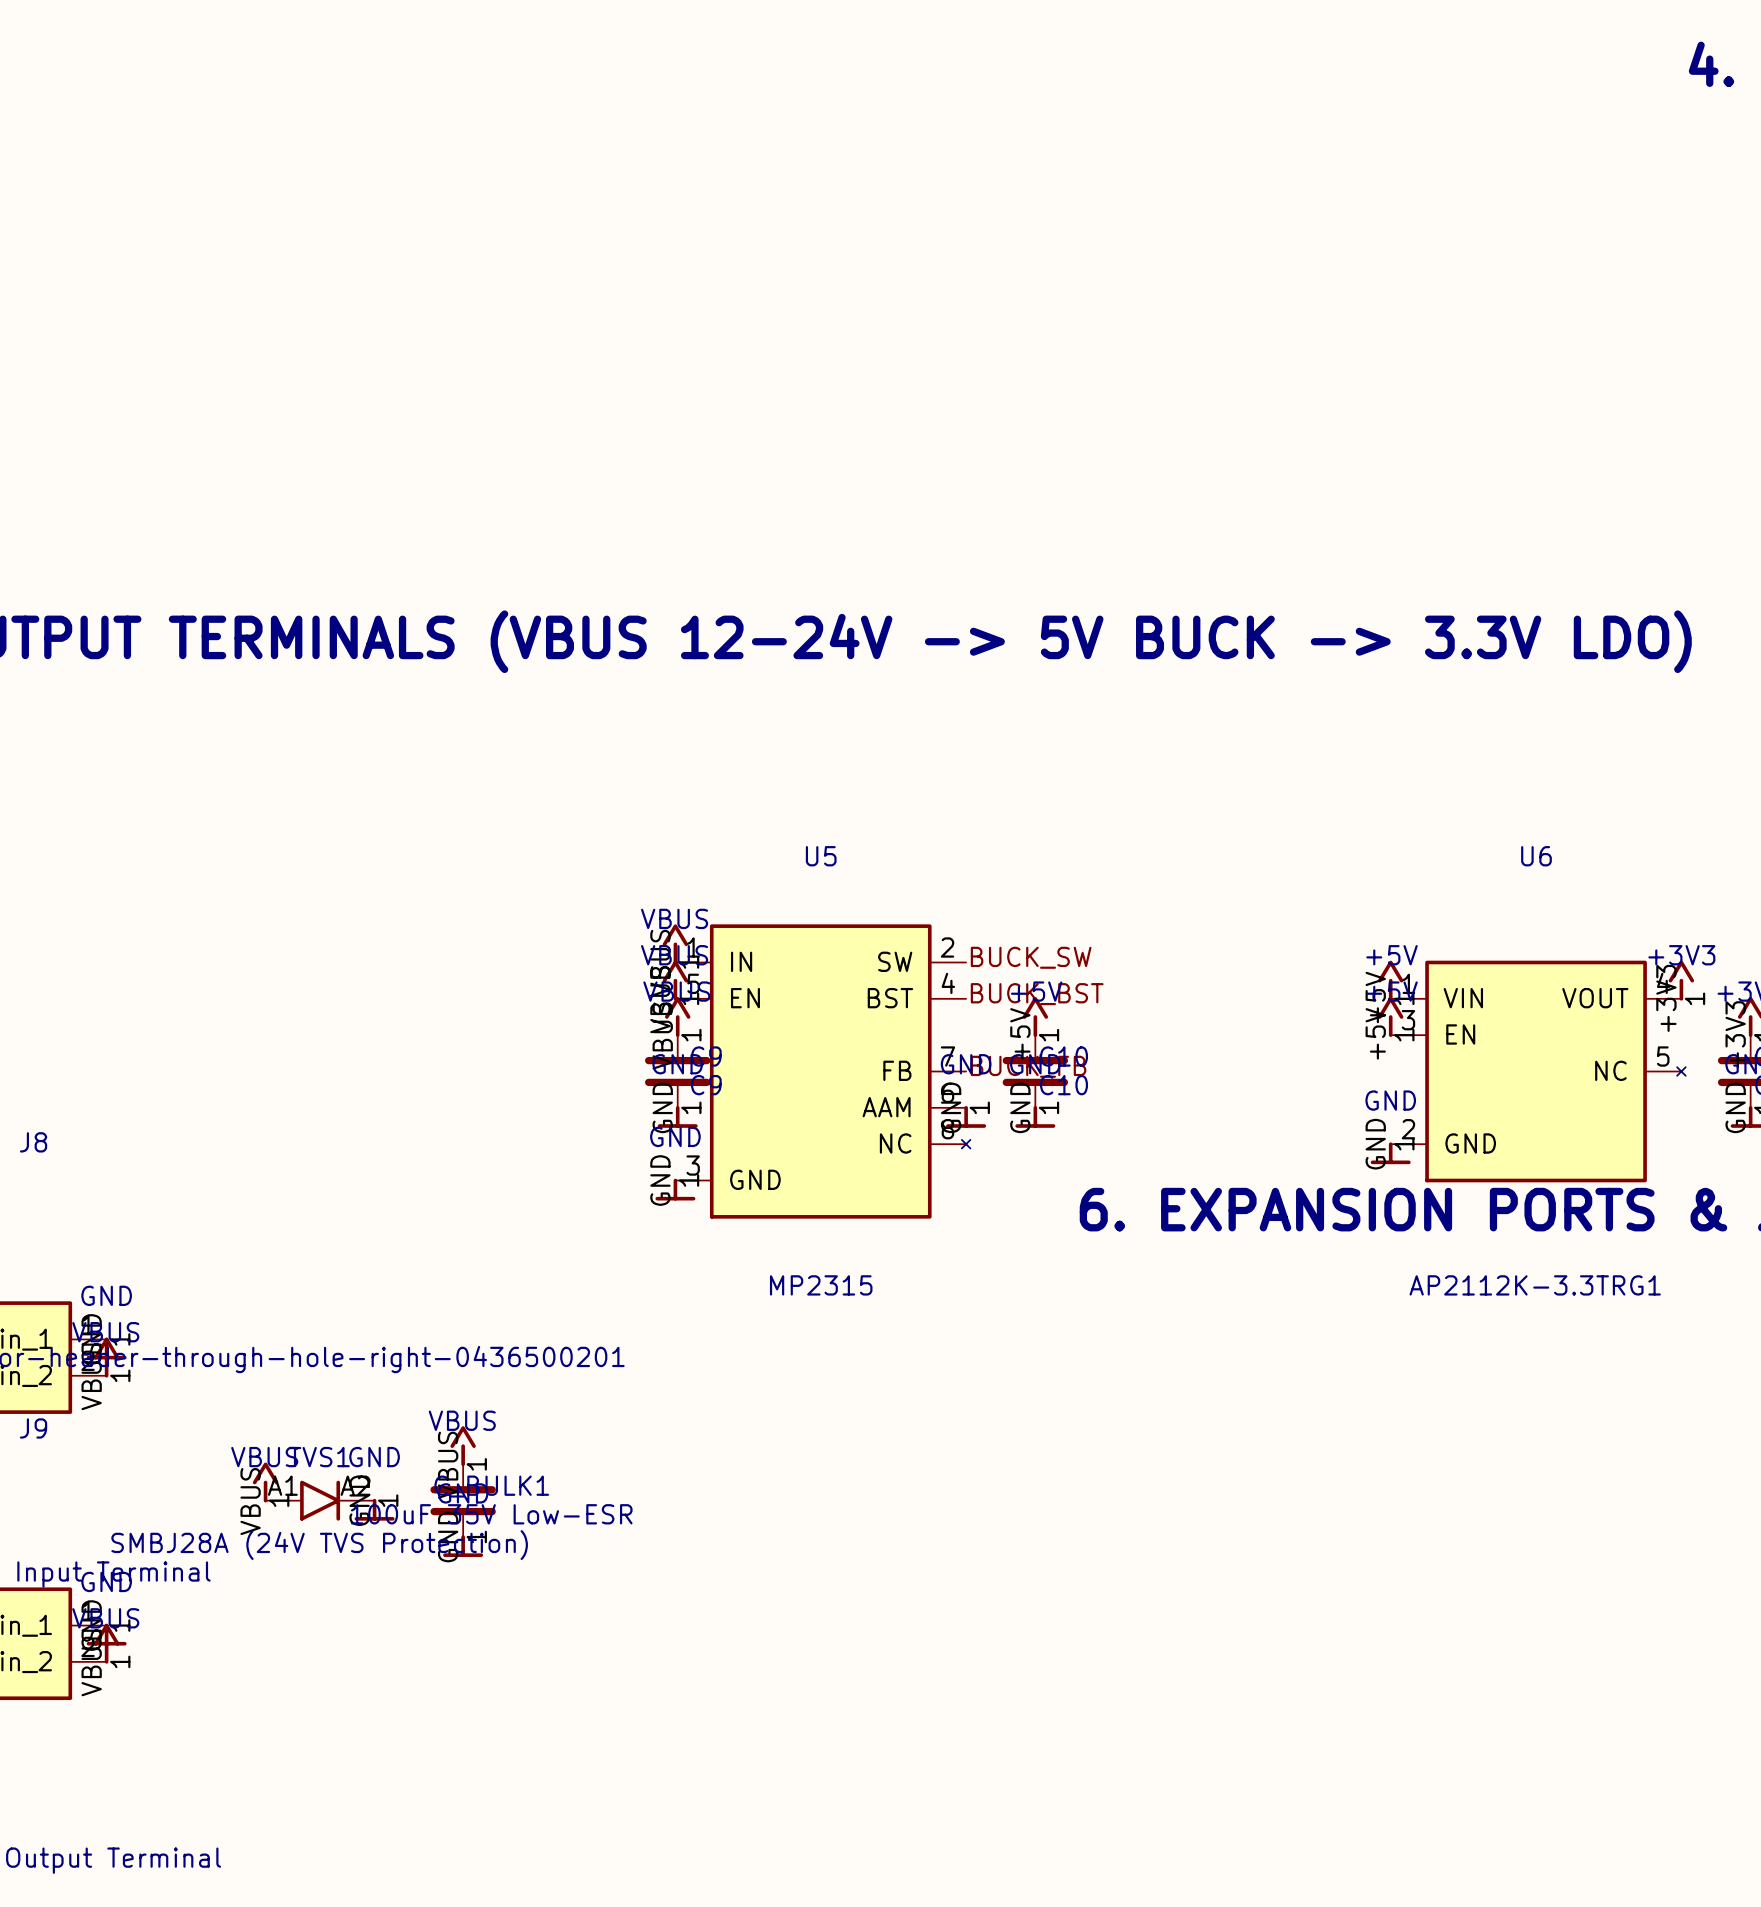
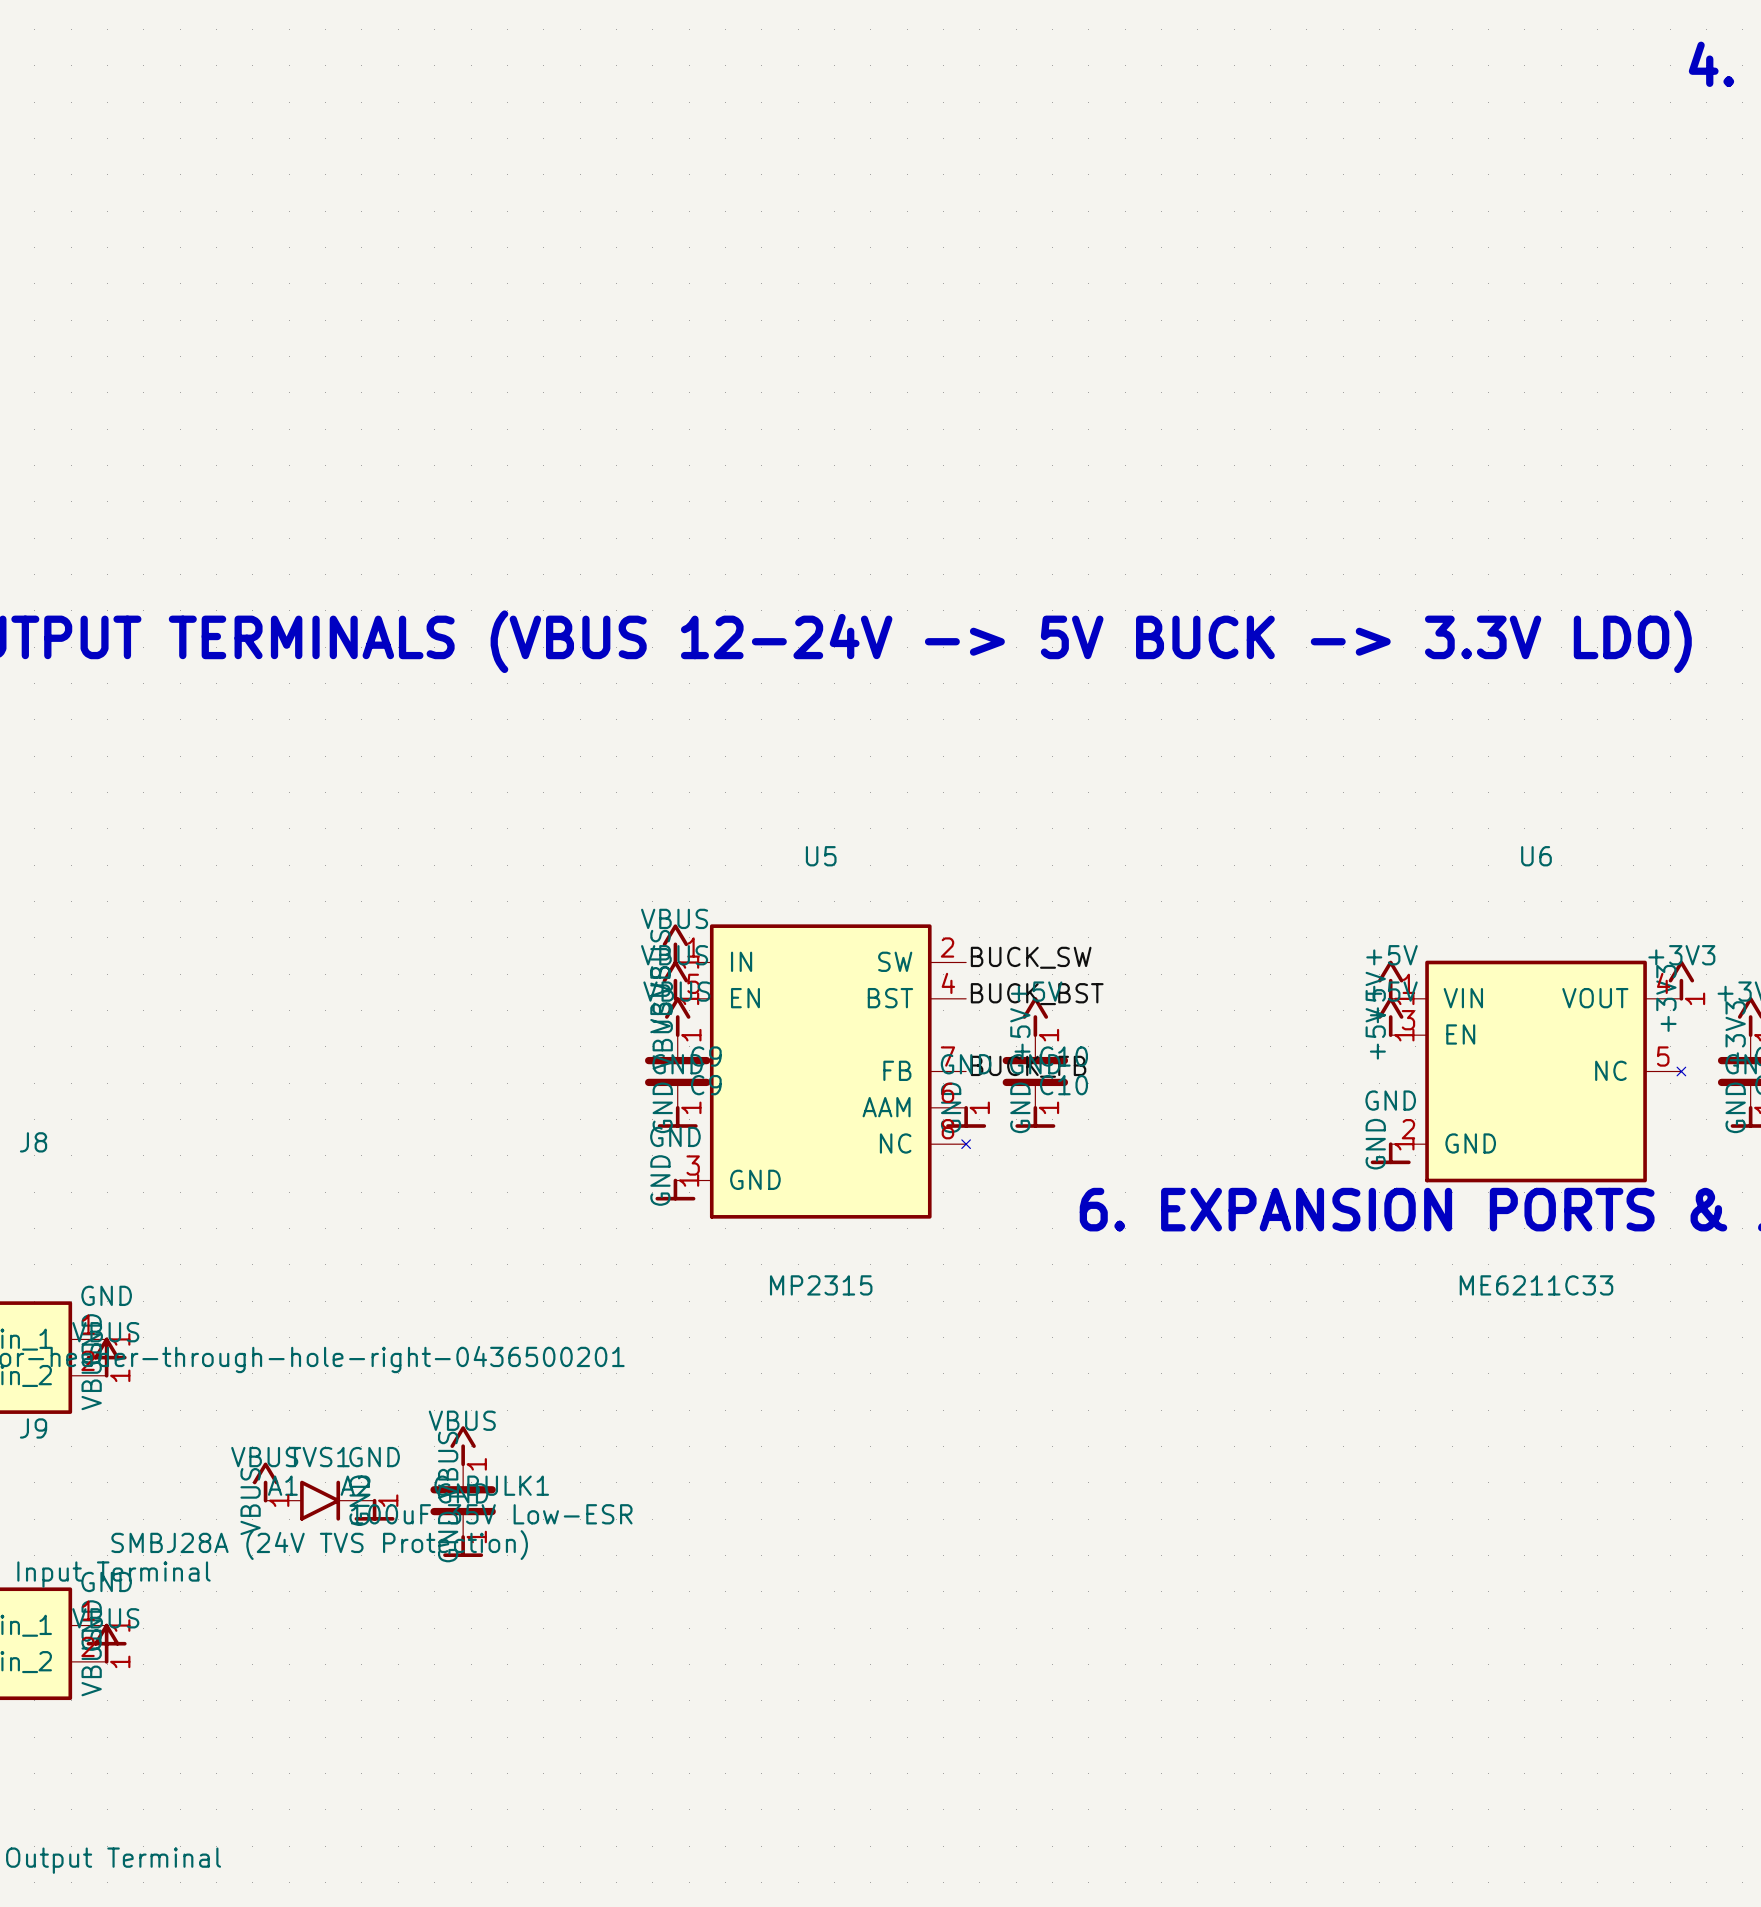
U6 value: AP2112K-3.3TRG1 (1535, 1285) -> ME6211C33 (1536, 1285)

